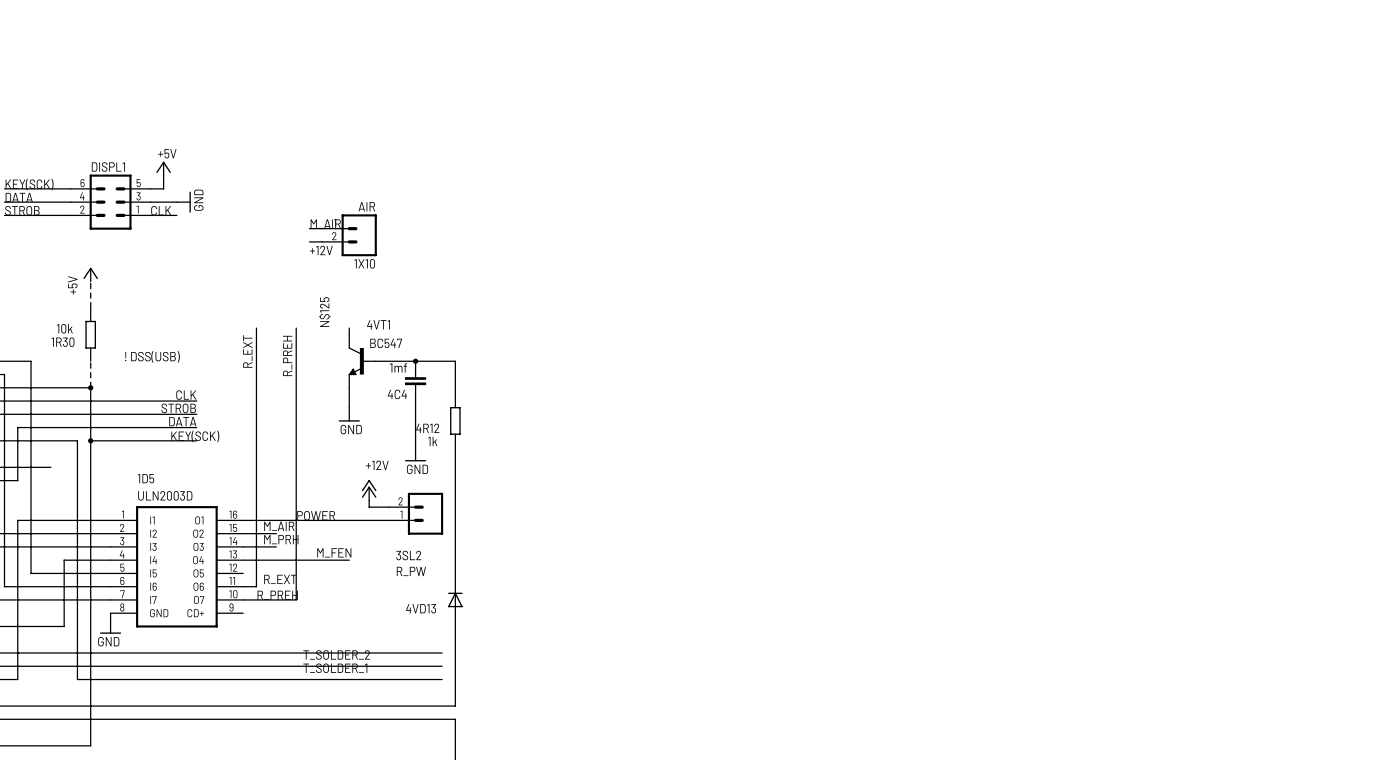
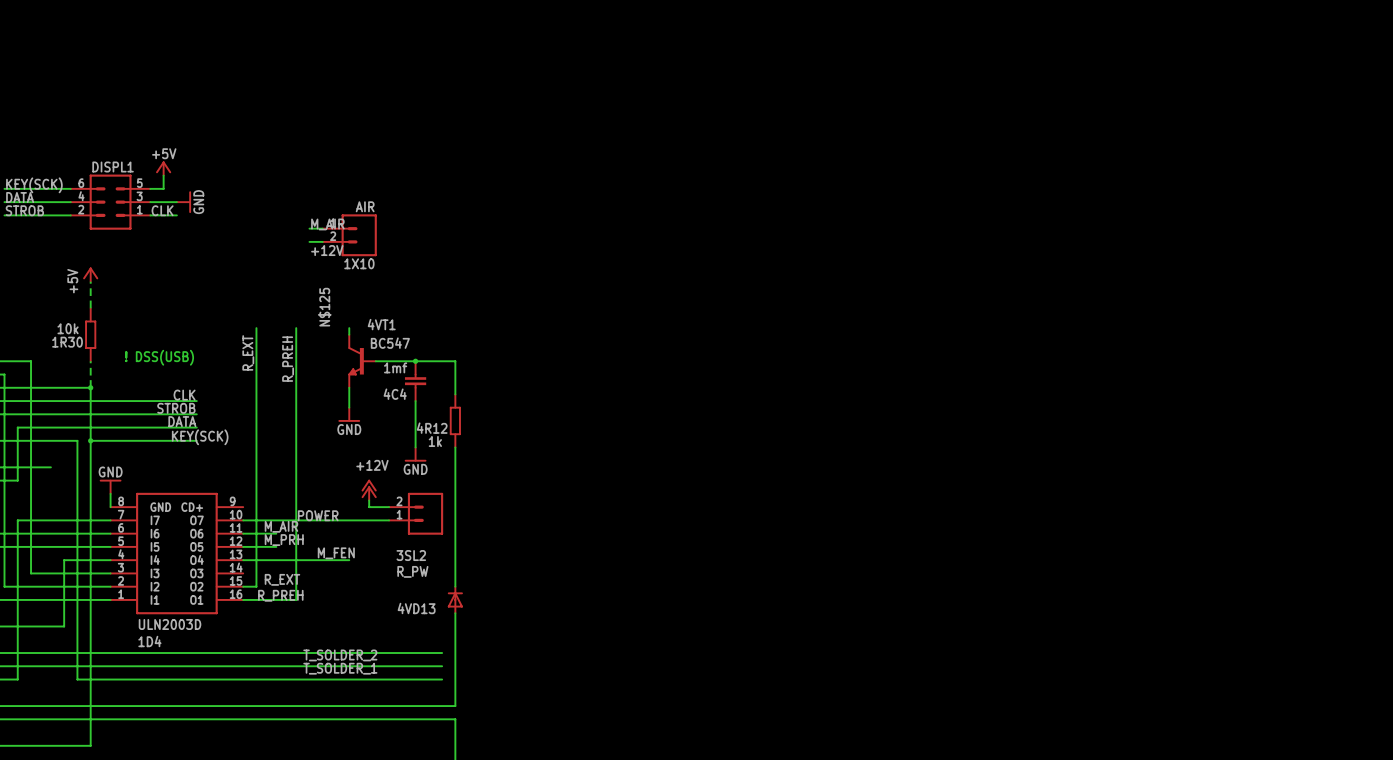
power symbol: none -> GND (110, 486)
wire: none -> (110, 493) (110, 507)
1D4: none -> ULN2003D (176, 553)
1D5: ULN2003D (176, 566) -> none
wire: (110, 613) (110, 619) -> none
power symbol: GND (110, 626) -> none

